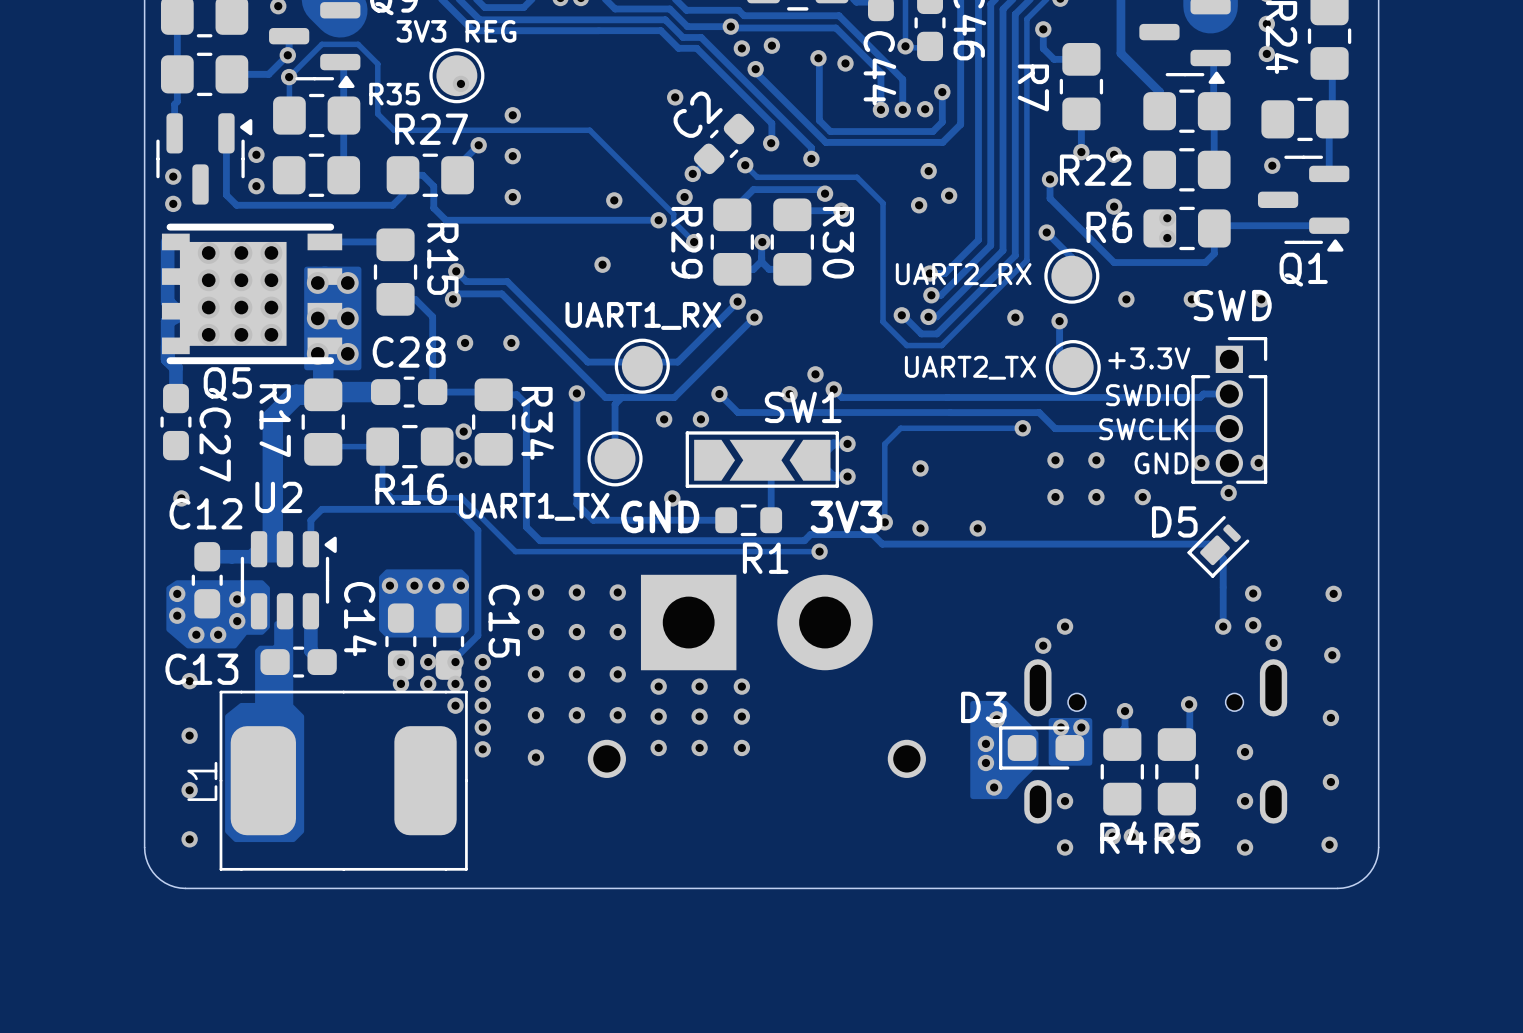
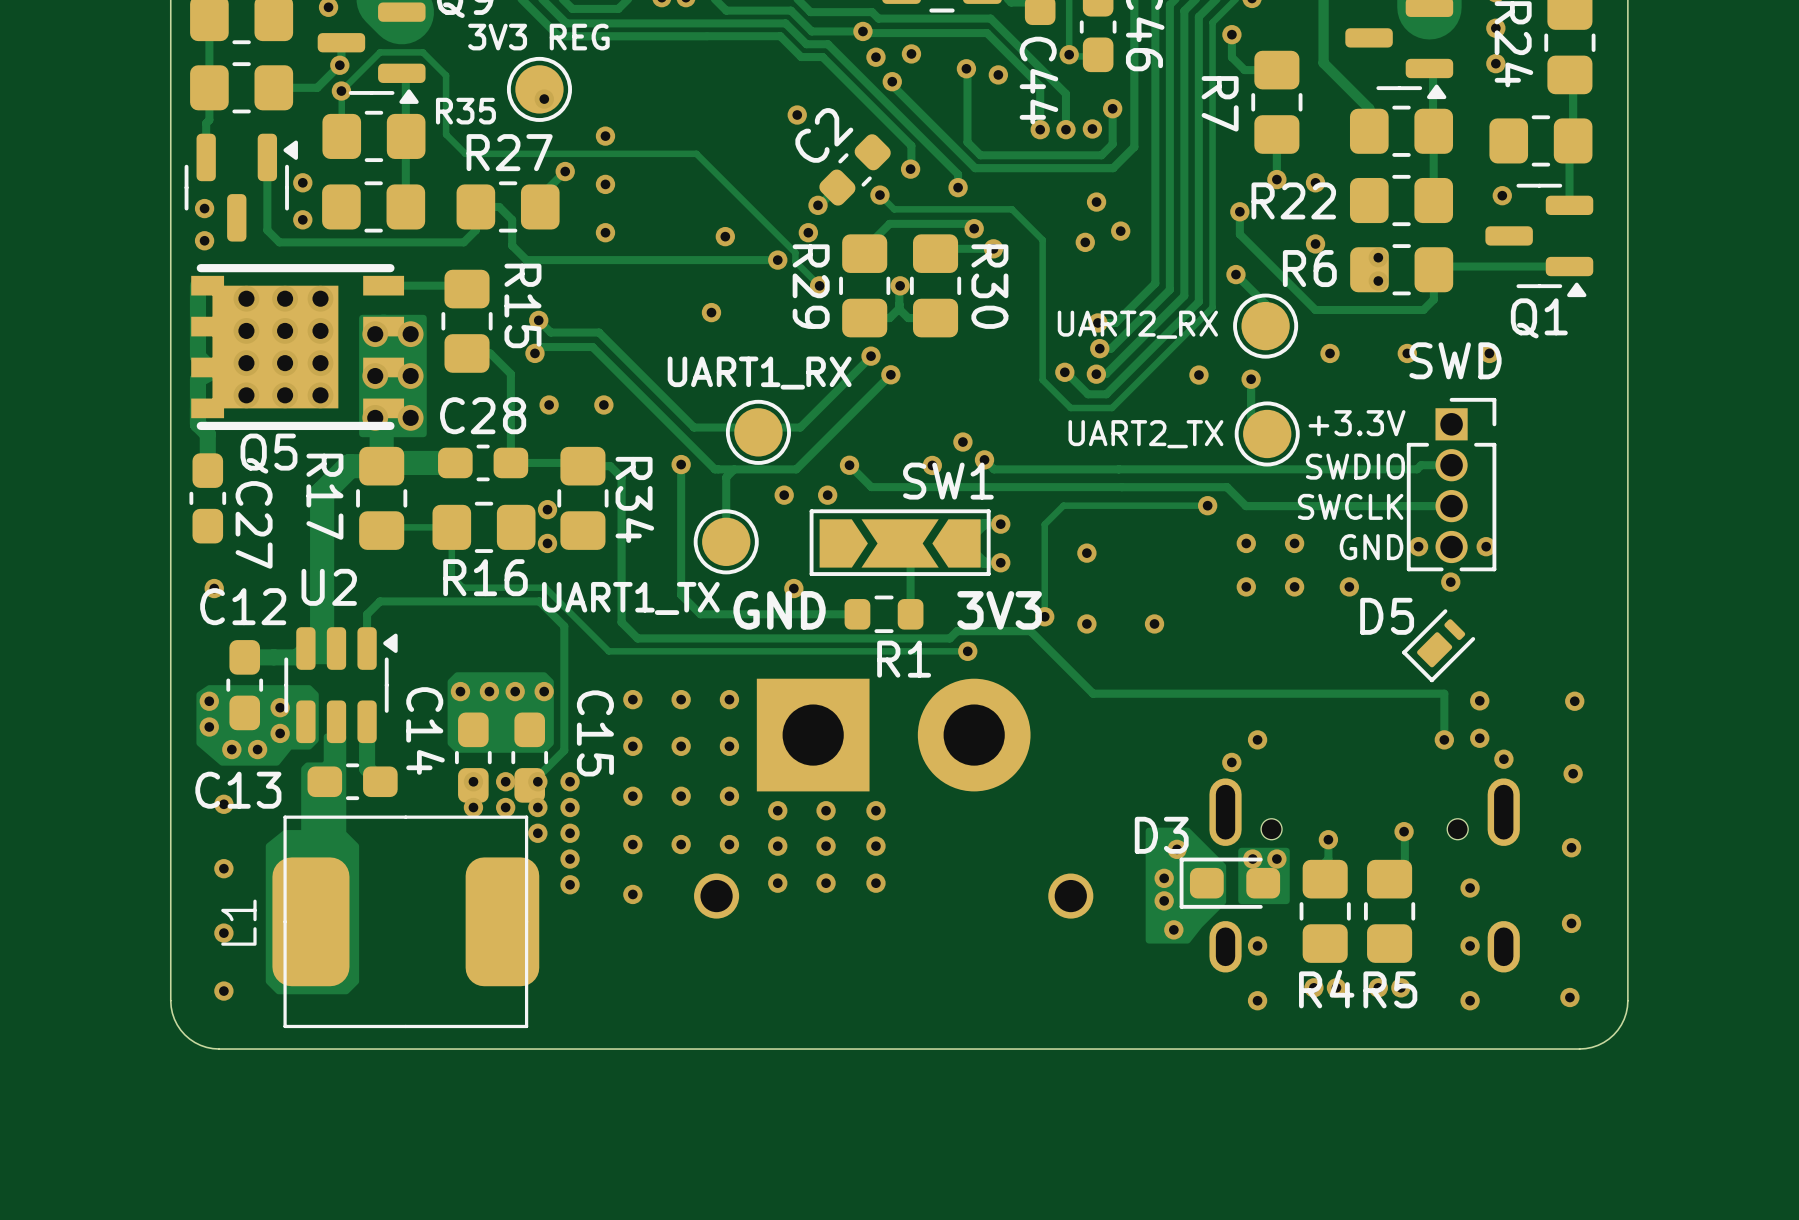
track: (882, 544) (1208, 544) (1223, 558) (1223, 587) -> (1041, 642) (1093, 693) (1444, 693)
L1 footprint: [219, 690, 468, 871] -> [272, 815, 540, 1029]

